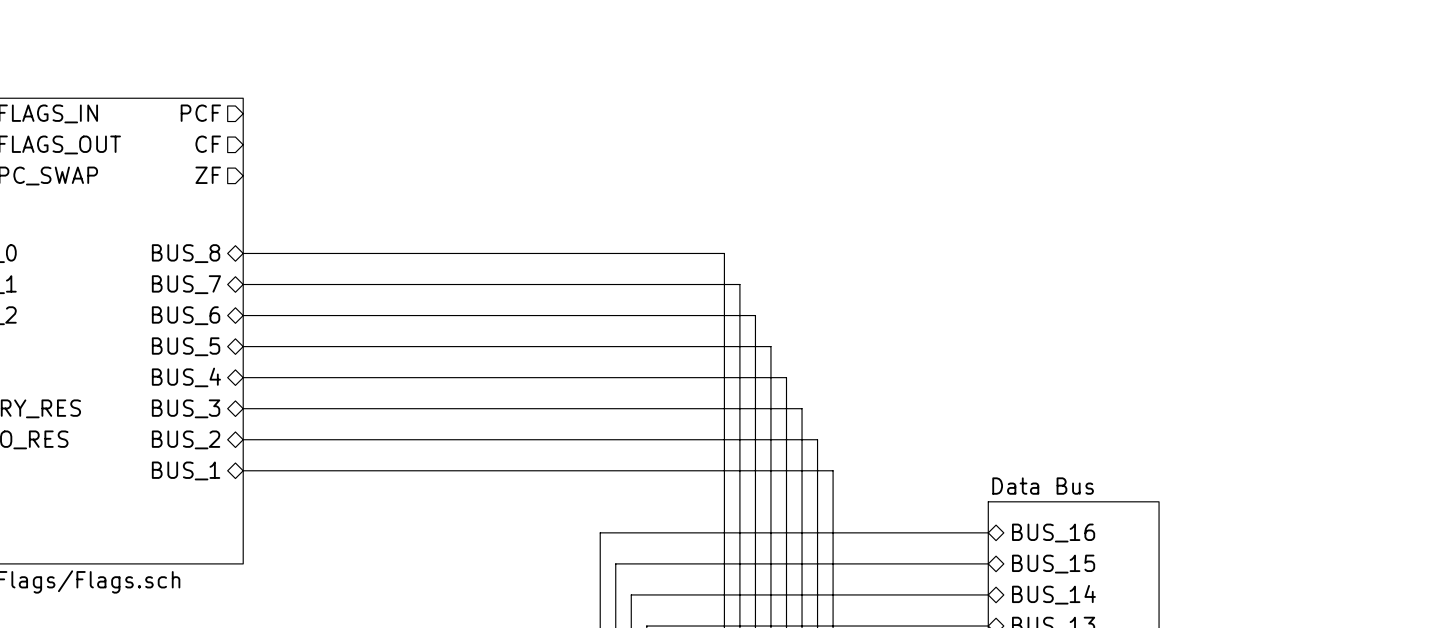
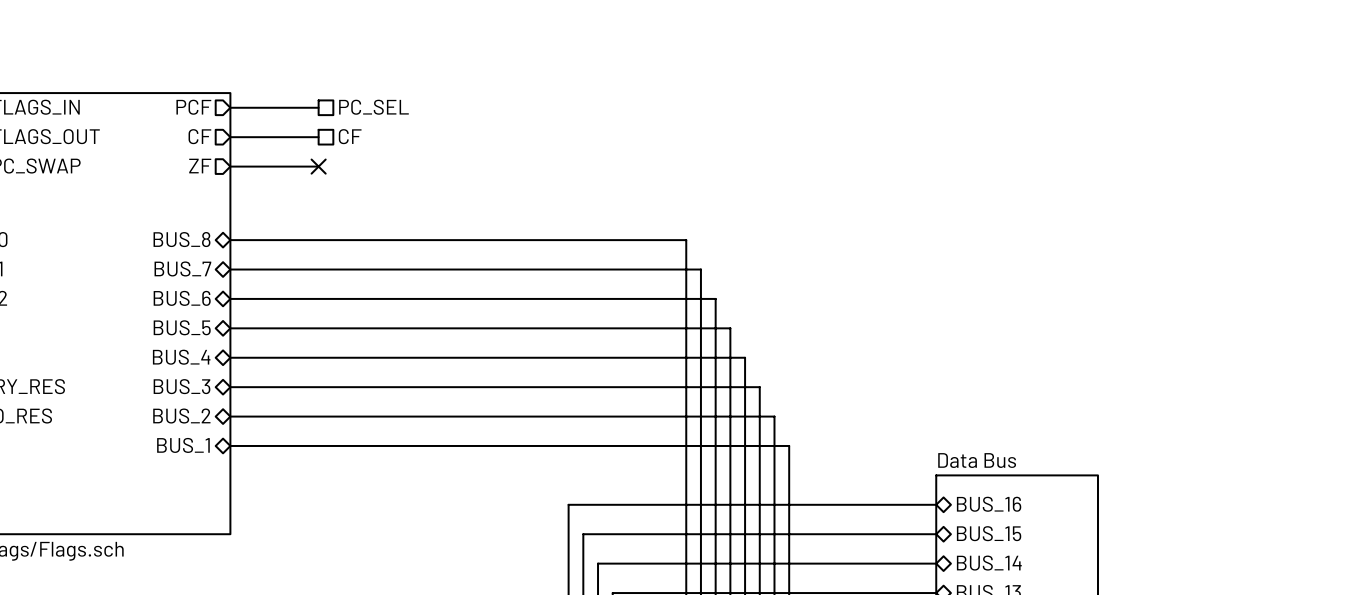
wire: none -> (230, 107) (318, 107)
hierarchical label: none -> PC_SEL (373, 107)
wire: none -> (230, 137) (318, 137)
hierarchical label: none -> CF (350, 136)
wire: none -> (230, 166) (318, 166)
no-connect mark: none -> (318, 166)

